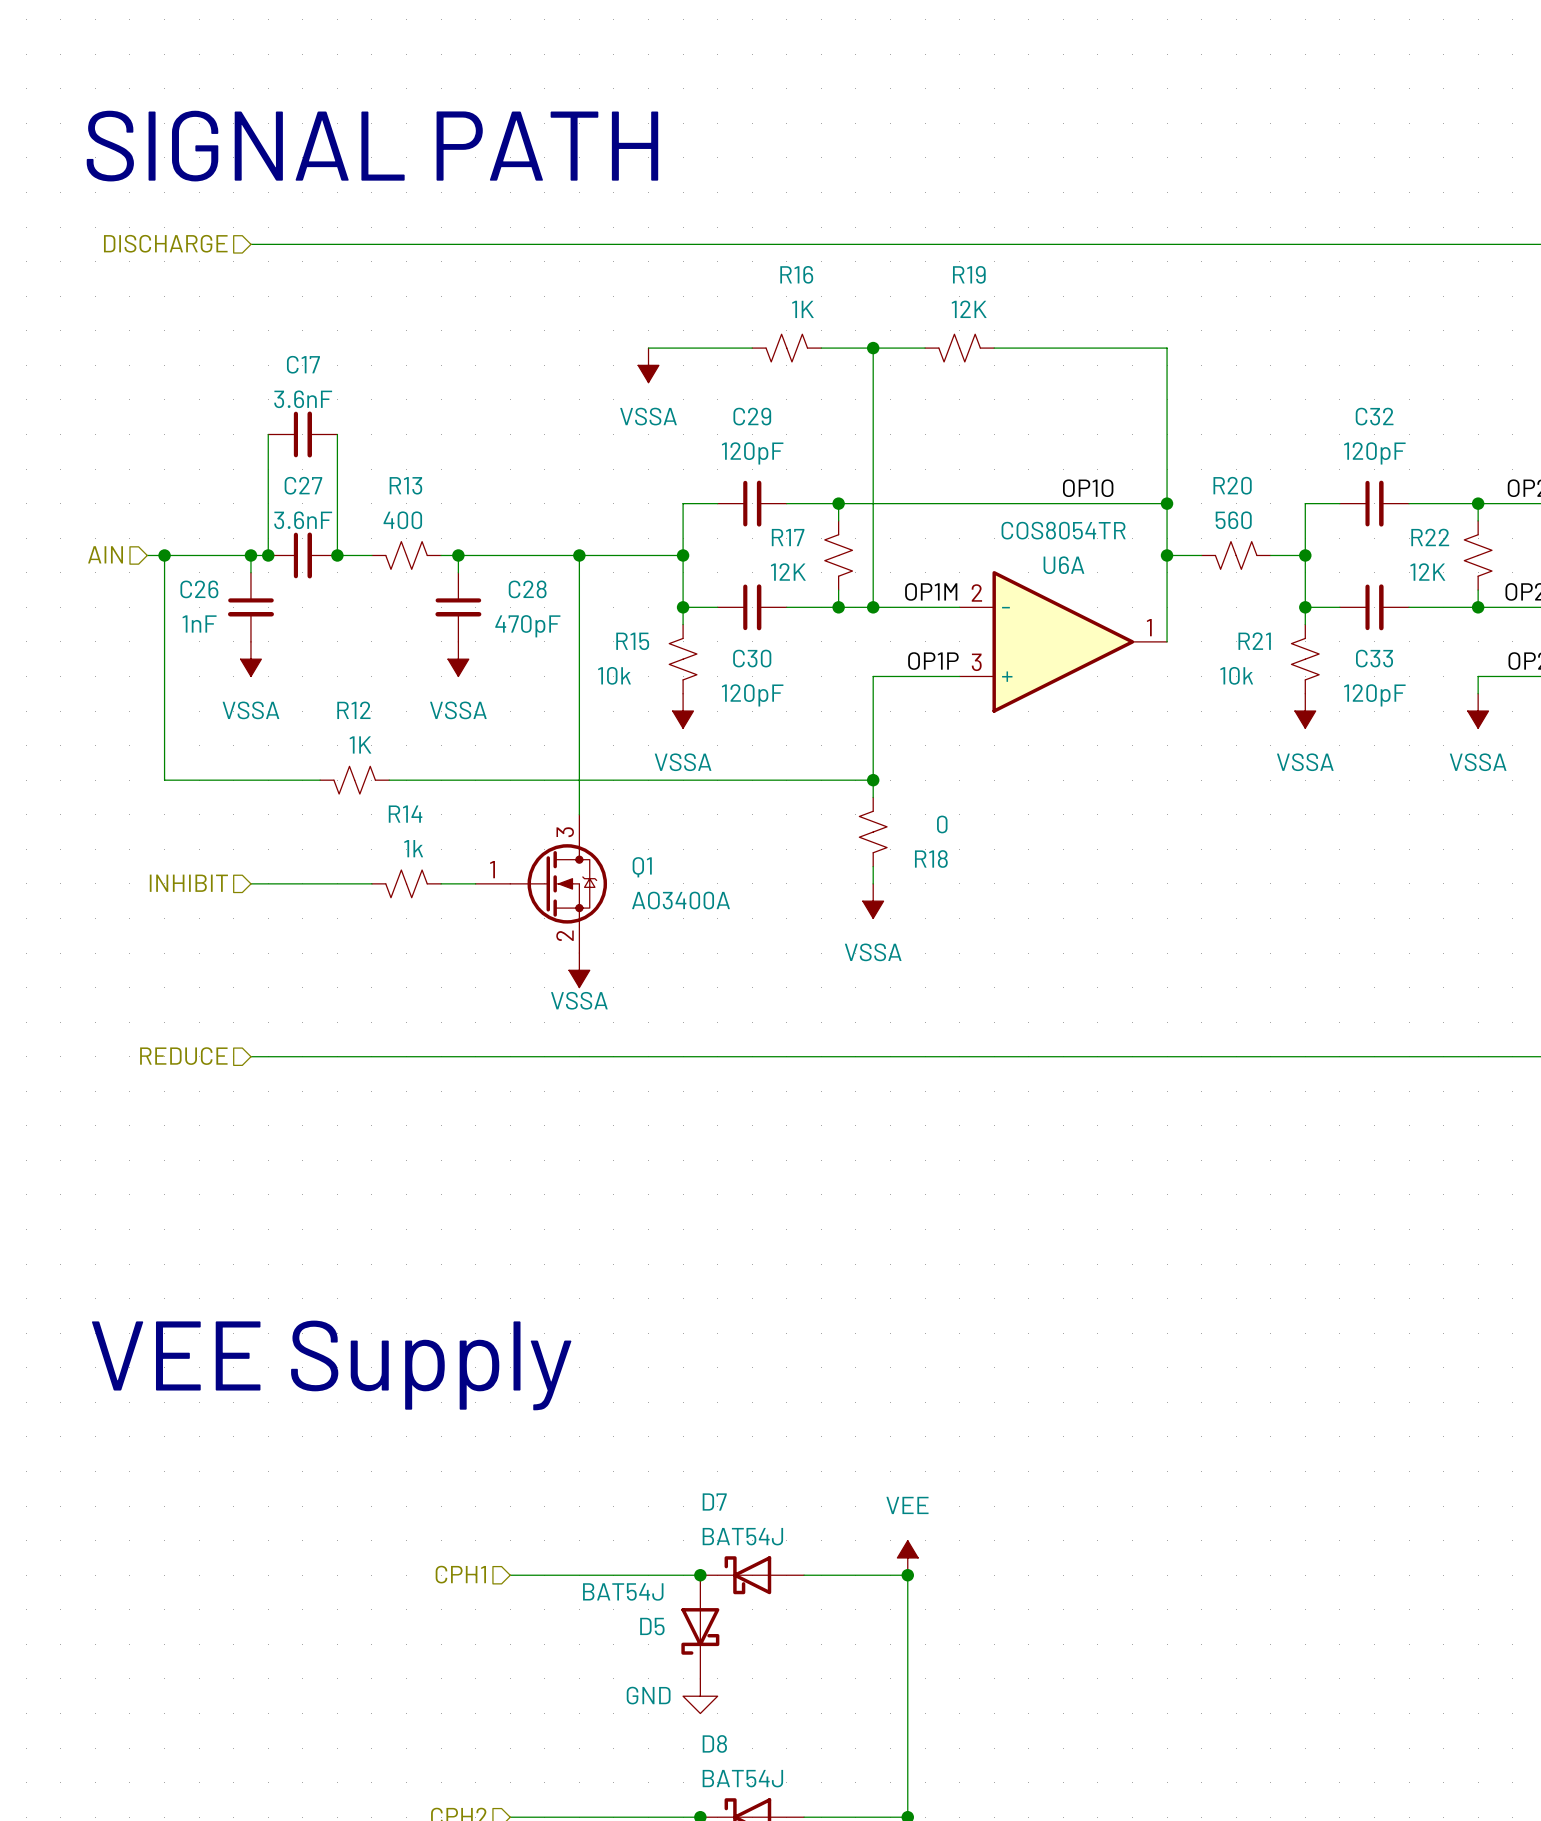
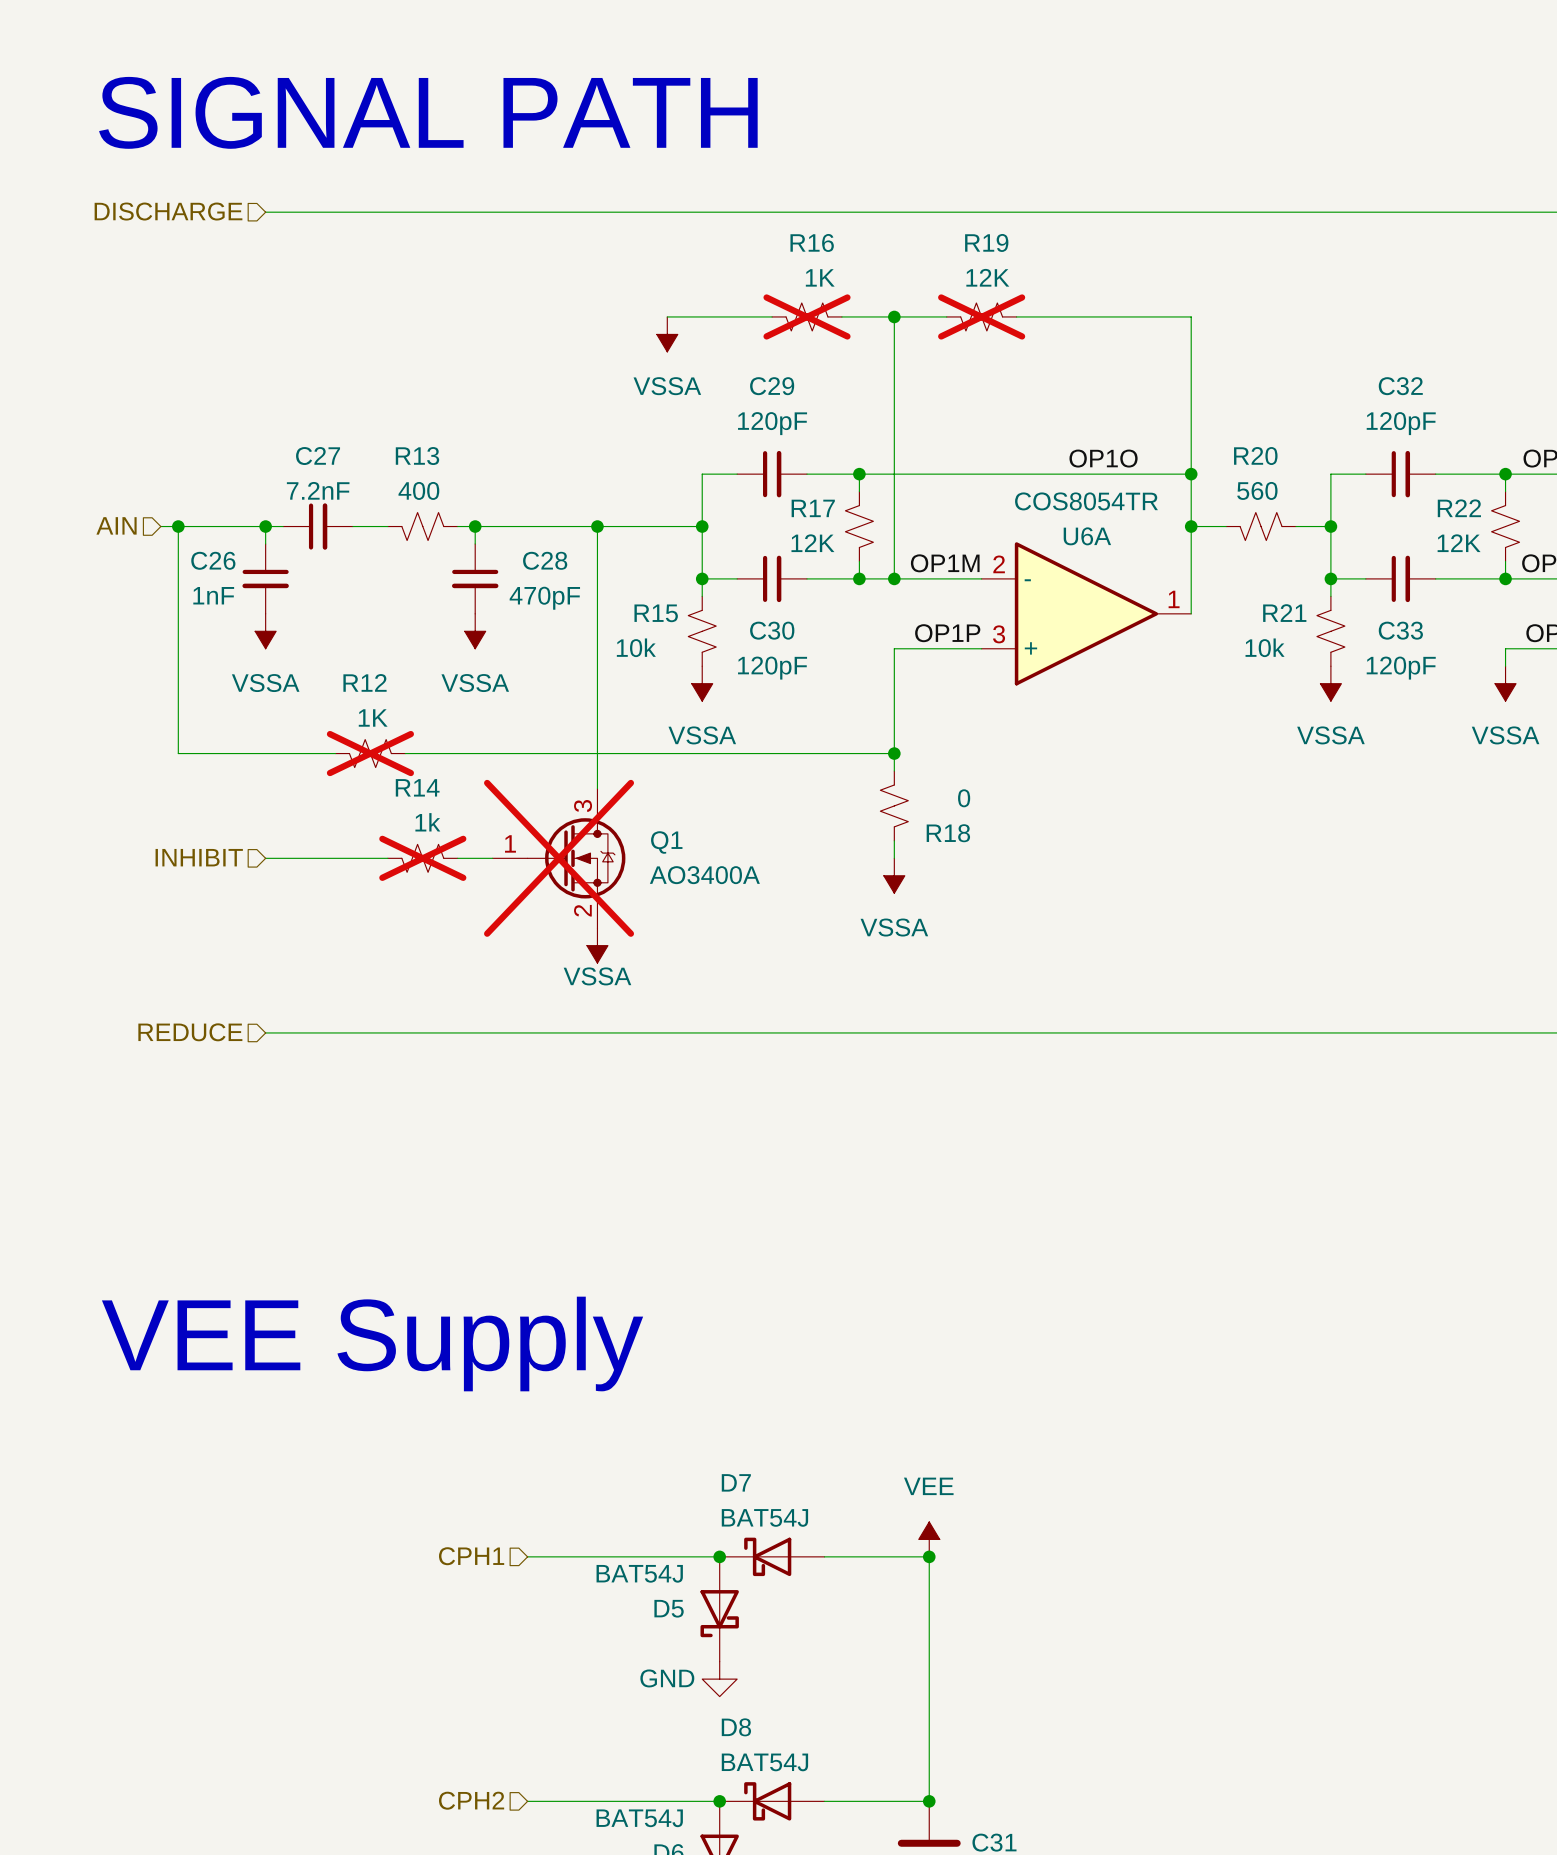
R16 do-not-place cross: none -> (807, 316)
R19 do-not-place cross: none -> (981, 316)
wire: (268, 434) (268, 555) -> none
C17: 3.6nF (302, 434) -> none
wire: (337, 434) (337, 555) -> none
C27 value: 3.6nF (303, 520) -> 7.2nF (318, 490)
junction: (268, 555) -> none
junction: (337, 555) -> none
R12 do-not-place cross: none -> (370, 753)
R14 do-not-place cross: none -> (422, 858)
Q1 do-not-place cross: none -> (559, 858)

